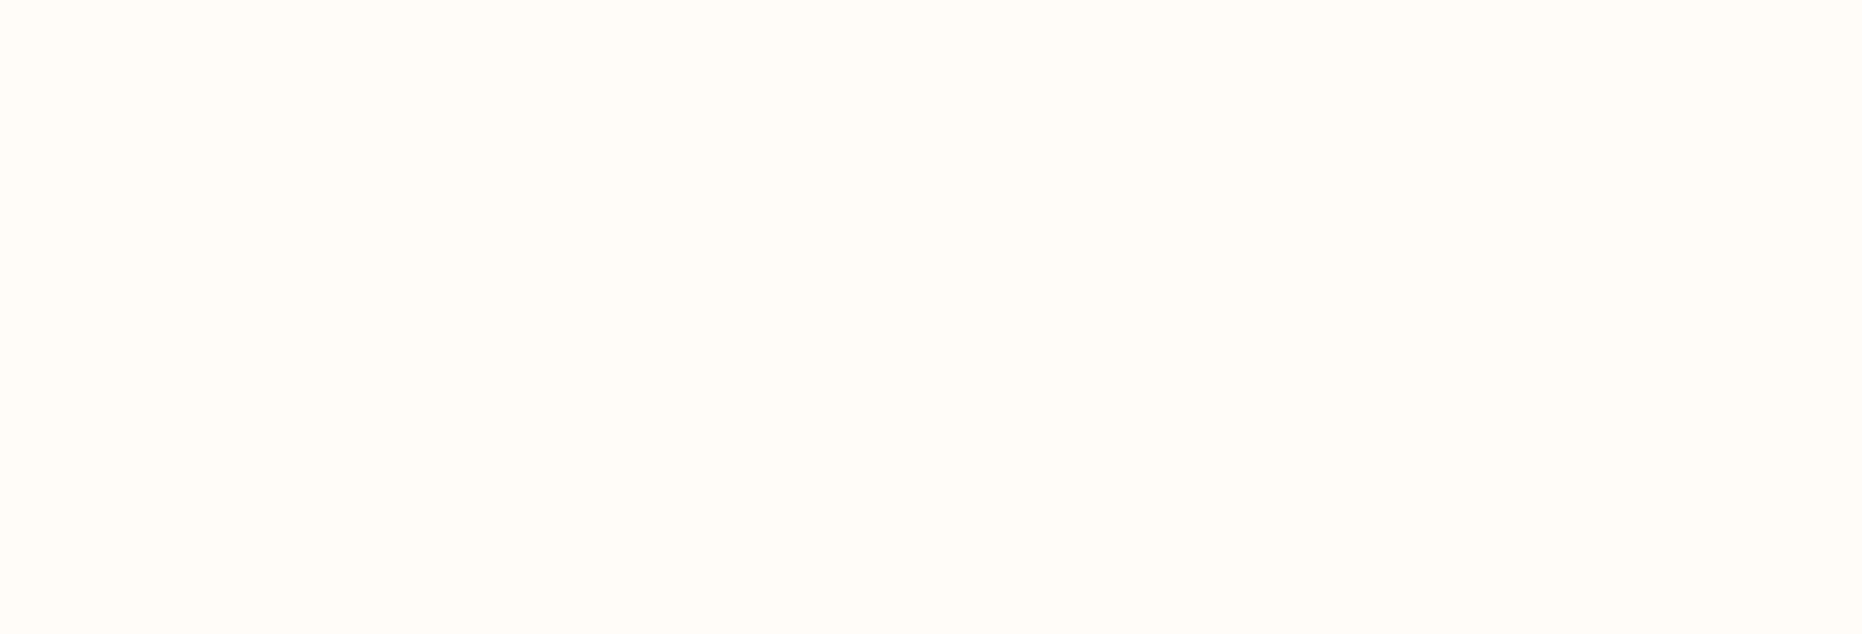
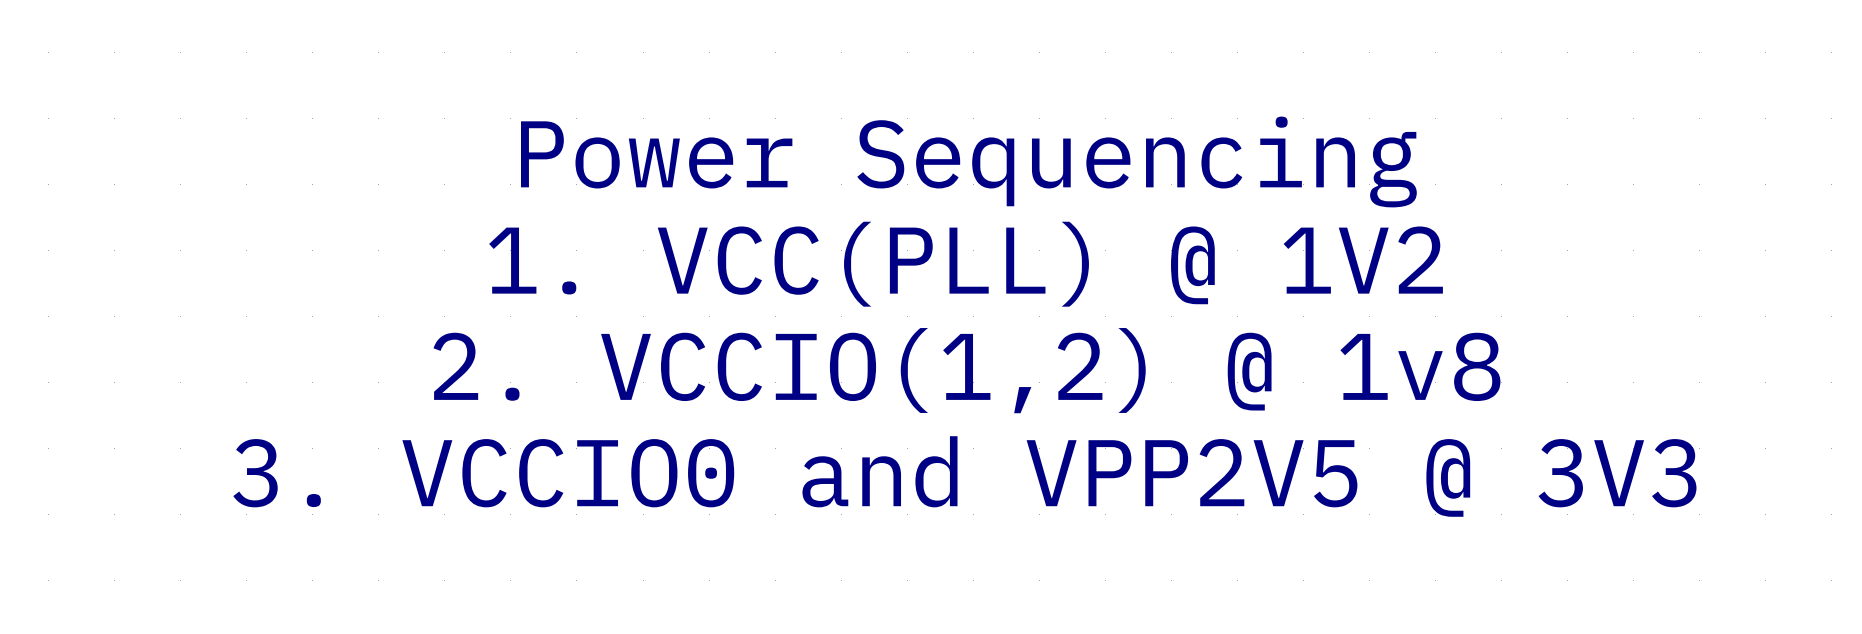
text: none -> Power Sequencing (968, 161)
text: none -> 1. VCC(PLL) @ 1V2 (966, 264)
text: none -> 2. VCCIO(1,2) @ 1v8 (966, 370)
text: none -> 3. VCCIO0 and VPP2V5 @ 3V3 (964, 476)

